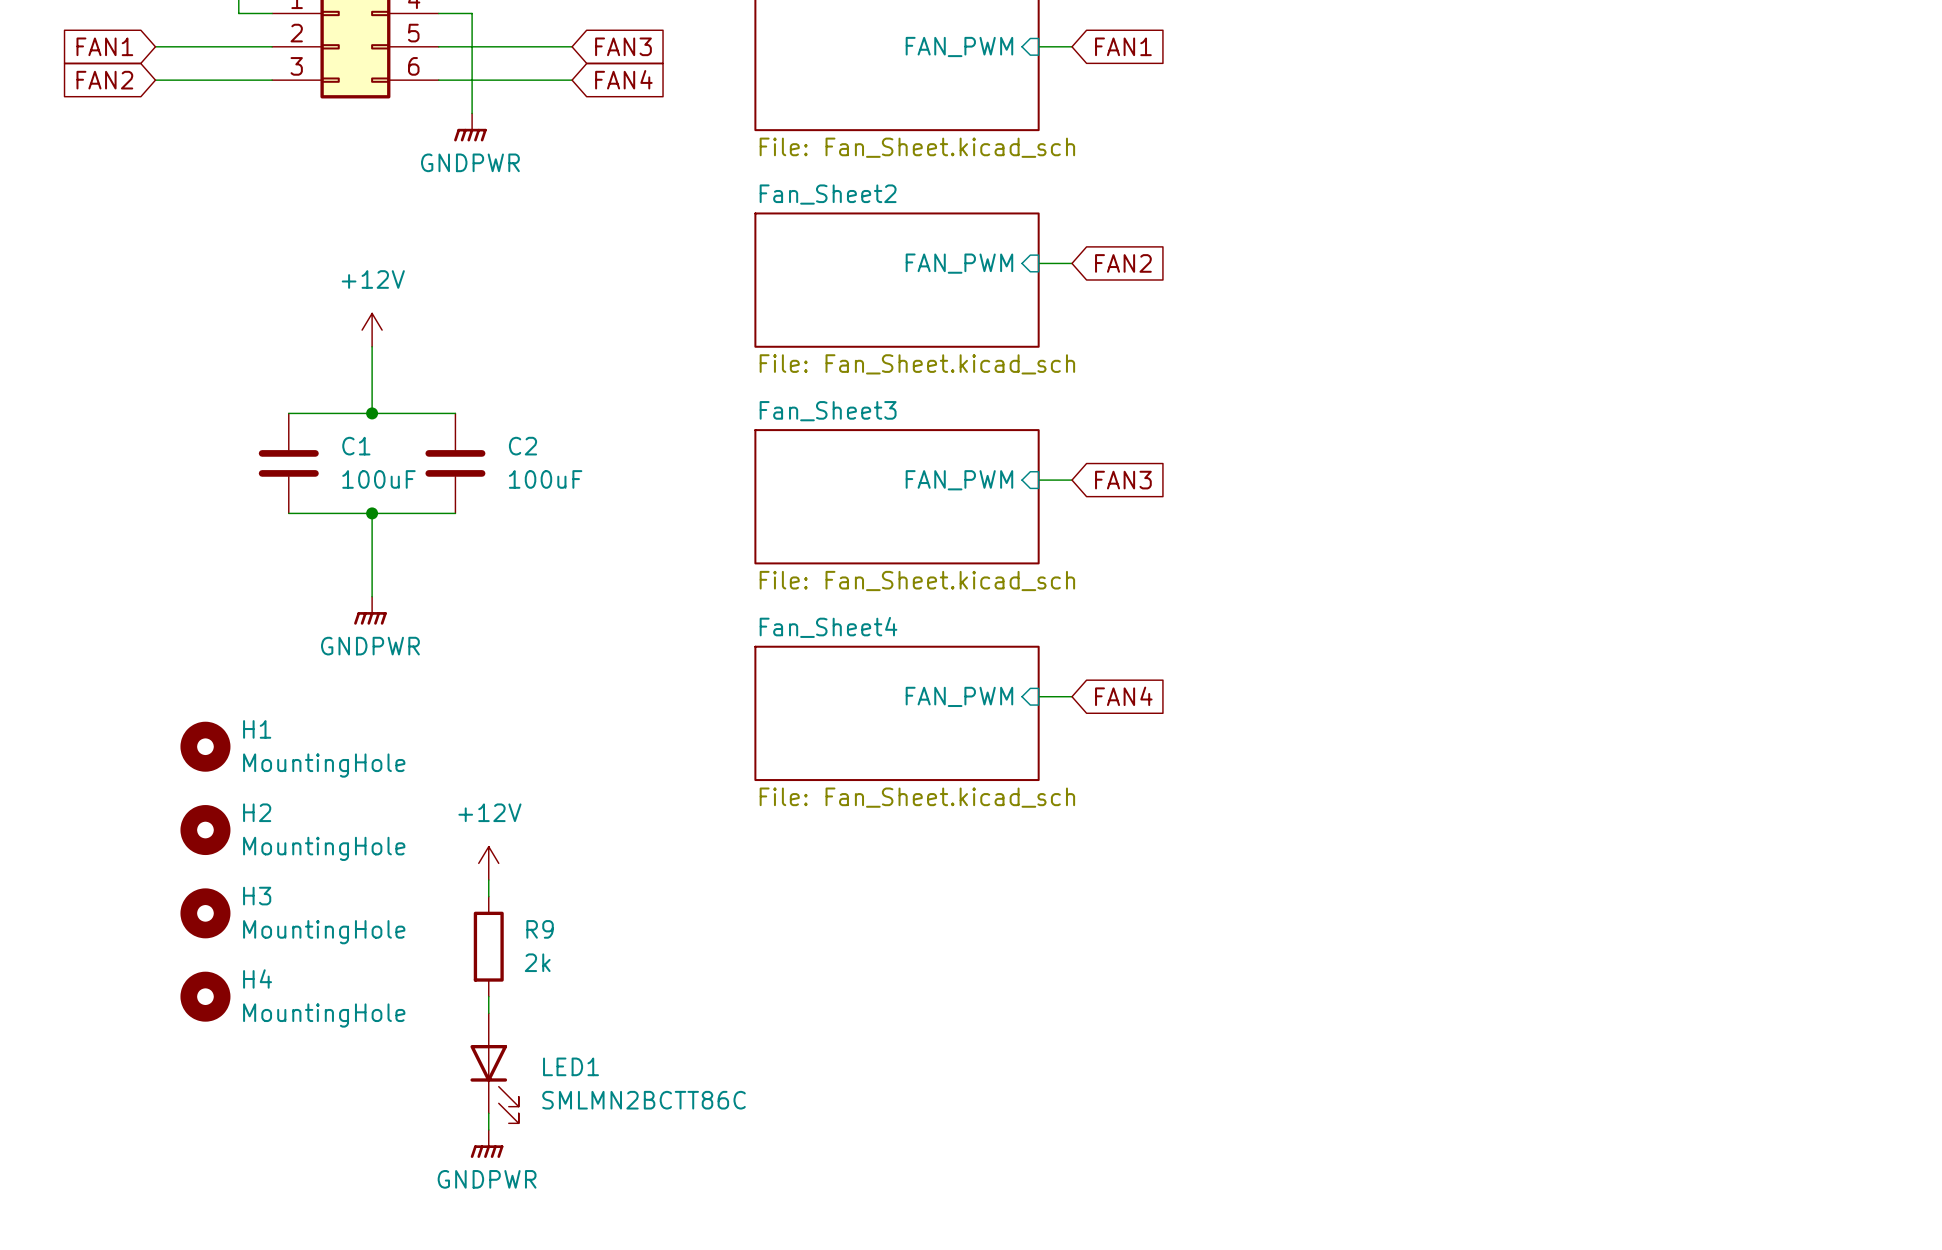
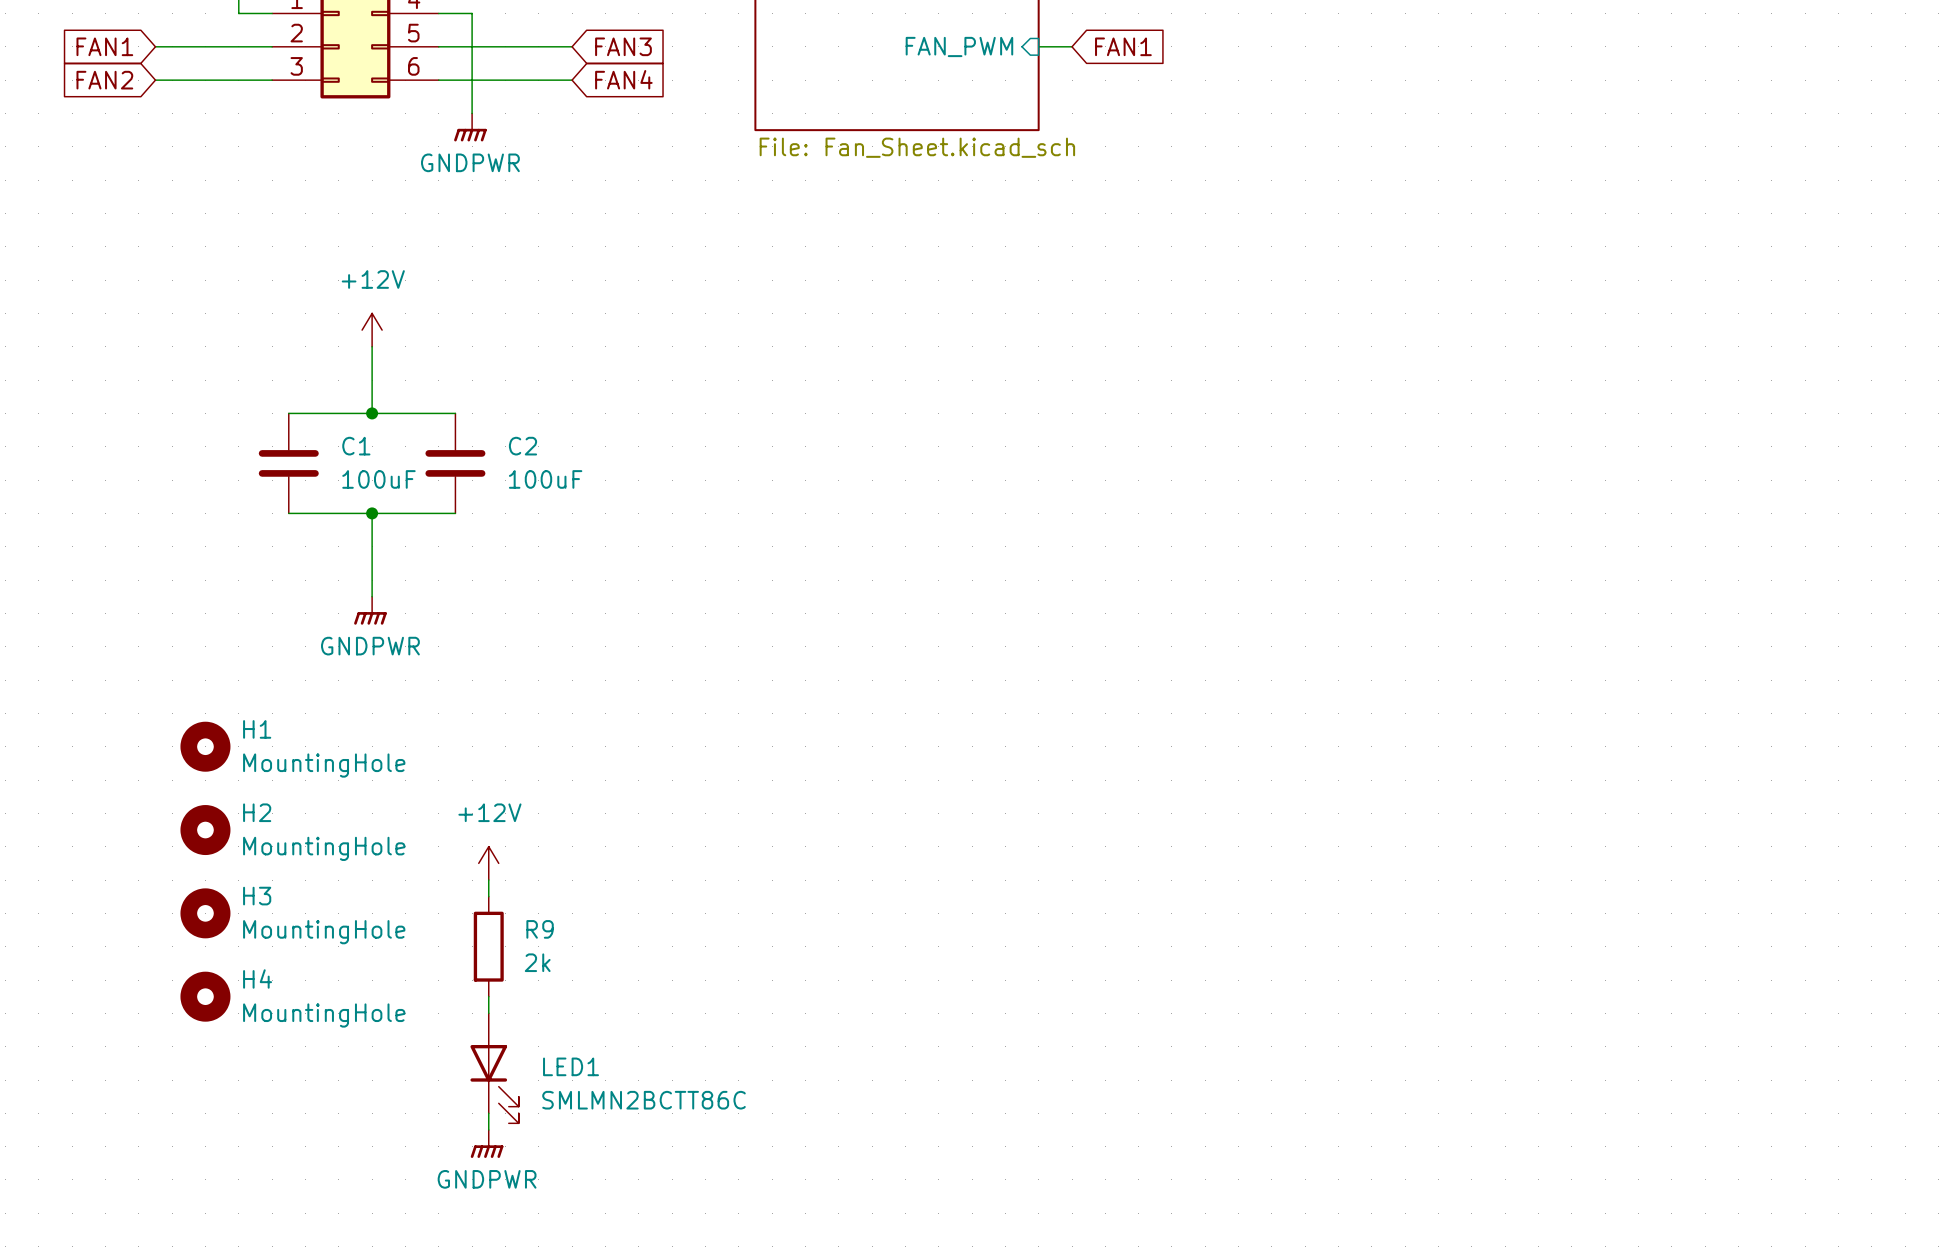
sheet pin: FAN_PWM (959, 263) -> none
wire: (1038, 263) (1072, 263) -> none
global label: FAN2 (1123, 263) -> none
sheet Fan_Sheet2: File: Fan_Sheet.kicad_sch (897, 280) -> none
sheet pin: FAN_PWM (959, 480) -> none
wire: (1038, 480) (1072, 480) -> none
global label: FAN3 (1123, 480) -> none
sheet Fan_Sheet3: File: Fan_Sheet.kicad_sch (897, 496) -> none
sheet pin: FAN_PWM (959, 696) -> none
wire: (1038, 696) (1072, 696) -> none
global label: FAN4 (1123, 696) -> none
sheet Fan_Sheet4: File: Fan_Sheet.kicad_sch (897, 713) -> none

